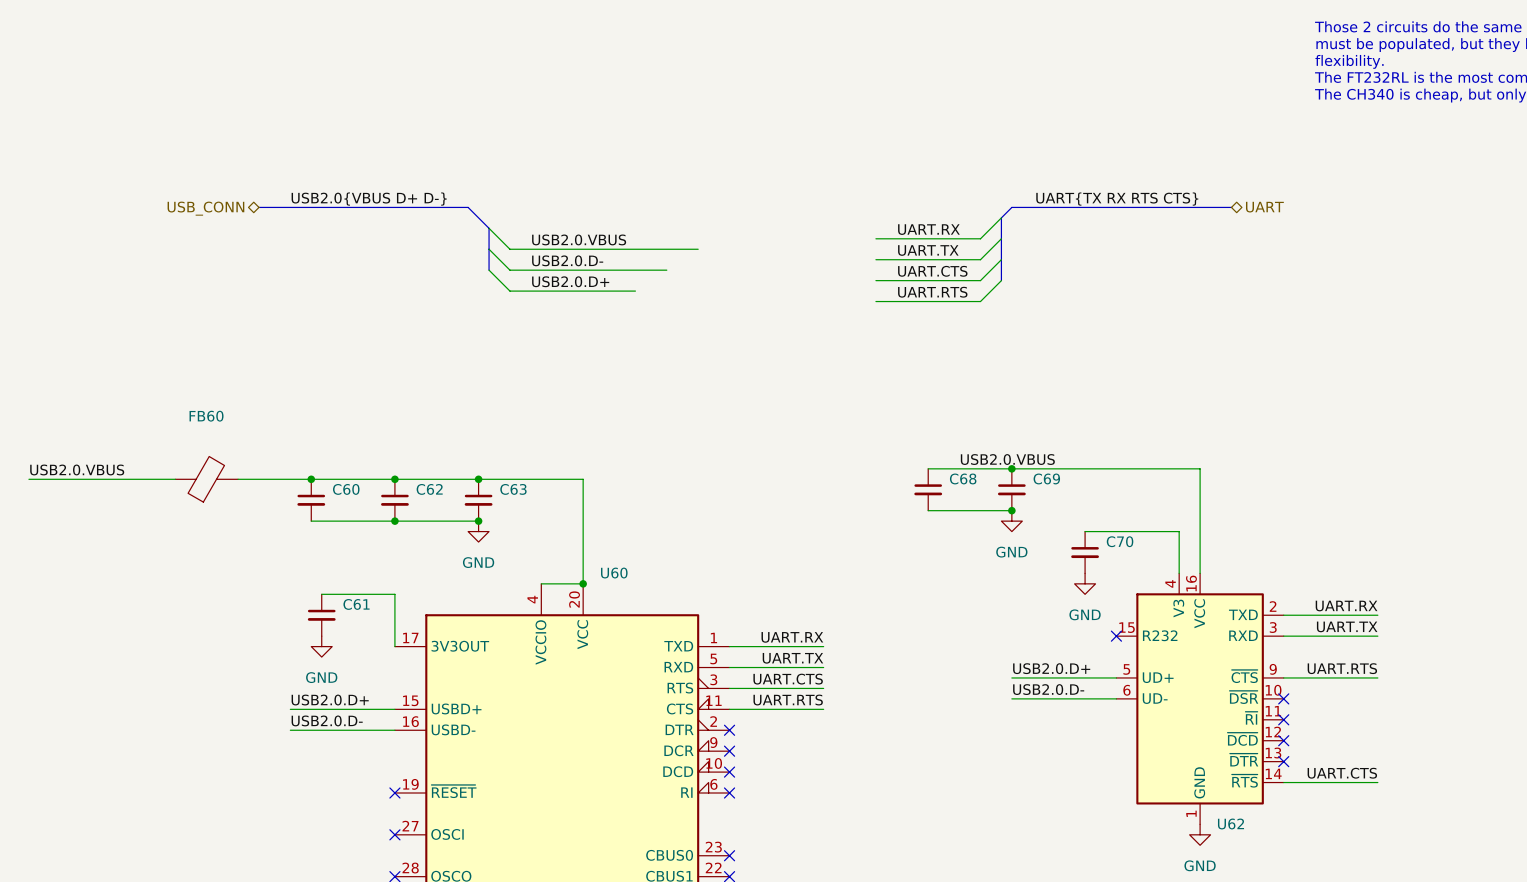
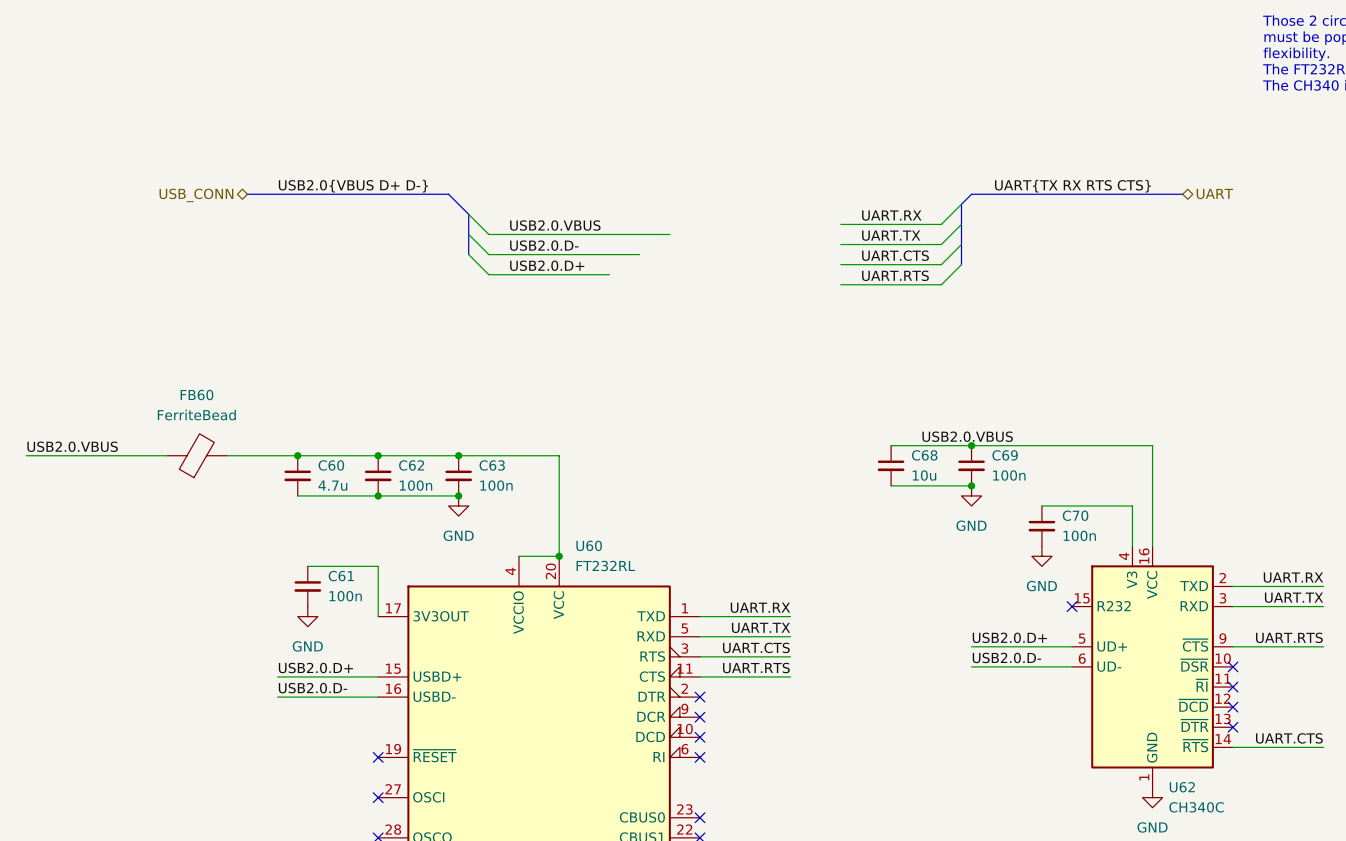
FB60 value: none -> FerriteBead (196, 415)
C68 value: none -> 10u (924, 475)
C69 value: none -> 100n (1009, 475)
C60 value: none -> 4.7u (332, 485)
C62 value: none -> 100n (416, 485)
C63 value: none -> 100n (496, 485)
C70 value: none -> 100n (1079, 535)
U60 value: none -> FT232RL (605, 565)
C61 value: none -> 100n (345, 596)
U62 value: none -> CH340C (1196, 807)

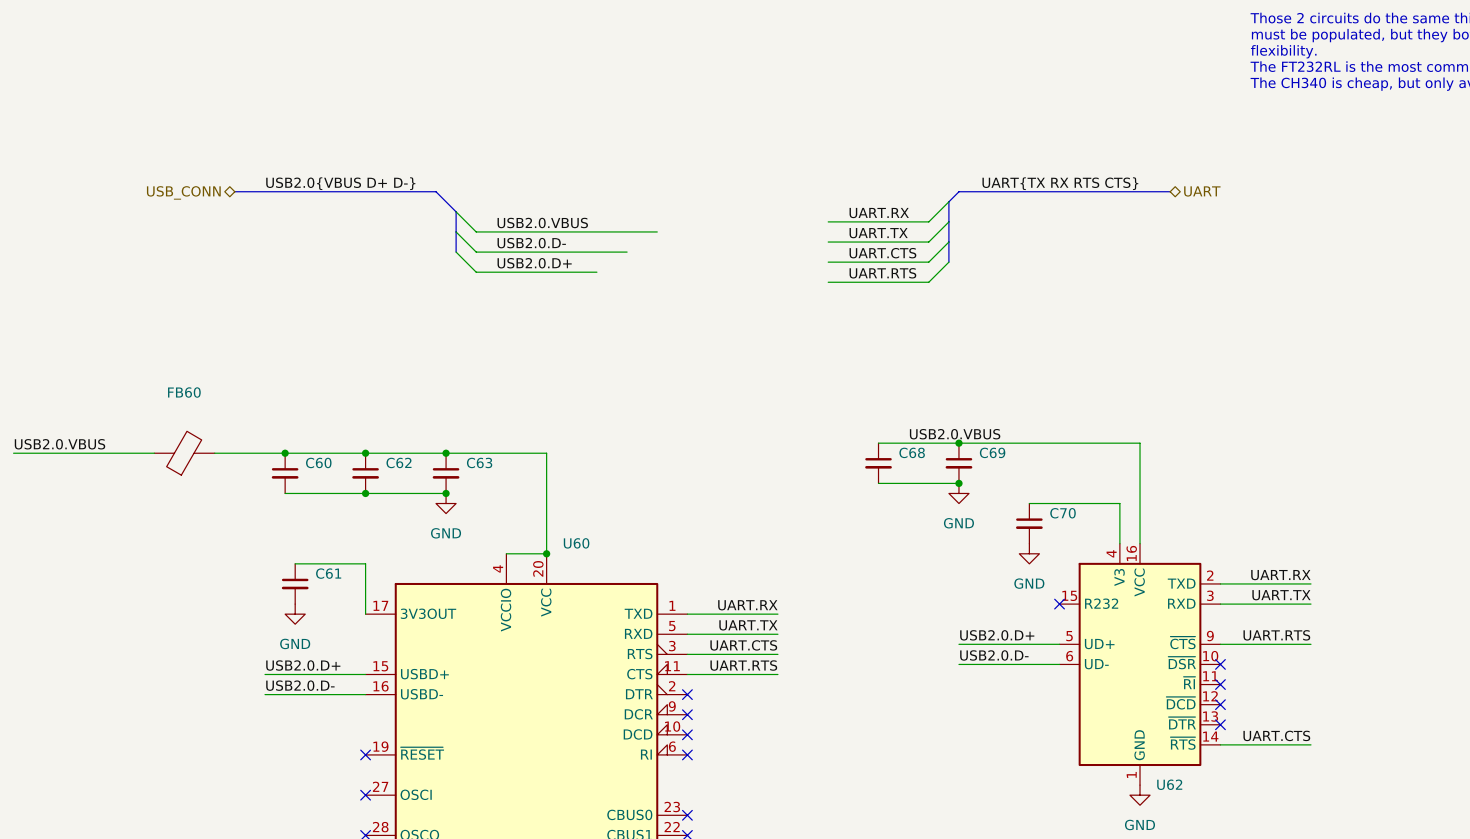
FB60 value: FerriteBead (196, 415) -> none
C68 value: 10u (924, 475) -> none
C69 value: 100n (1009, 475) -> none
C60 value: 4.7u (332, 485) -> none
C62 value: 100n (416, 485) -> none
C63 value: 100n (496, 485) -> none
C70 value: 100n (1079, 535) -> none
U60 value: FT232RL (605, 565) -> none
C61 value: 100n (345, 596) -> none
U62 value: CH340C (1196, 807) -> none

